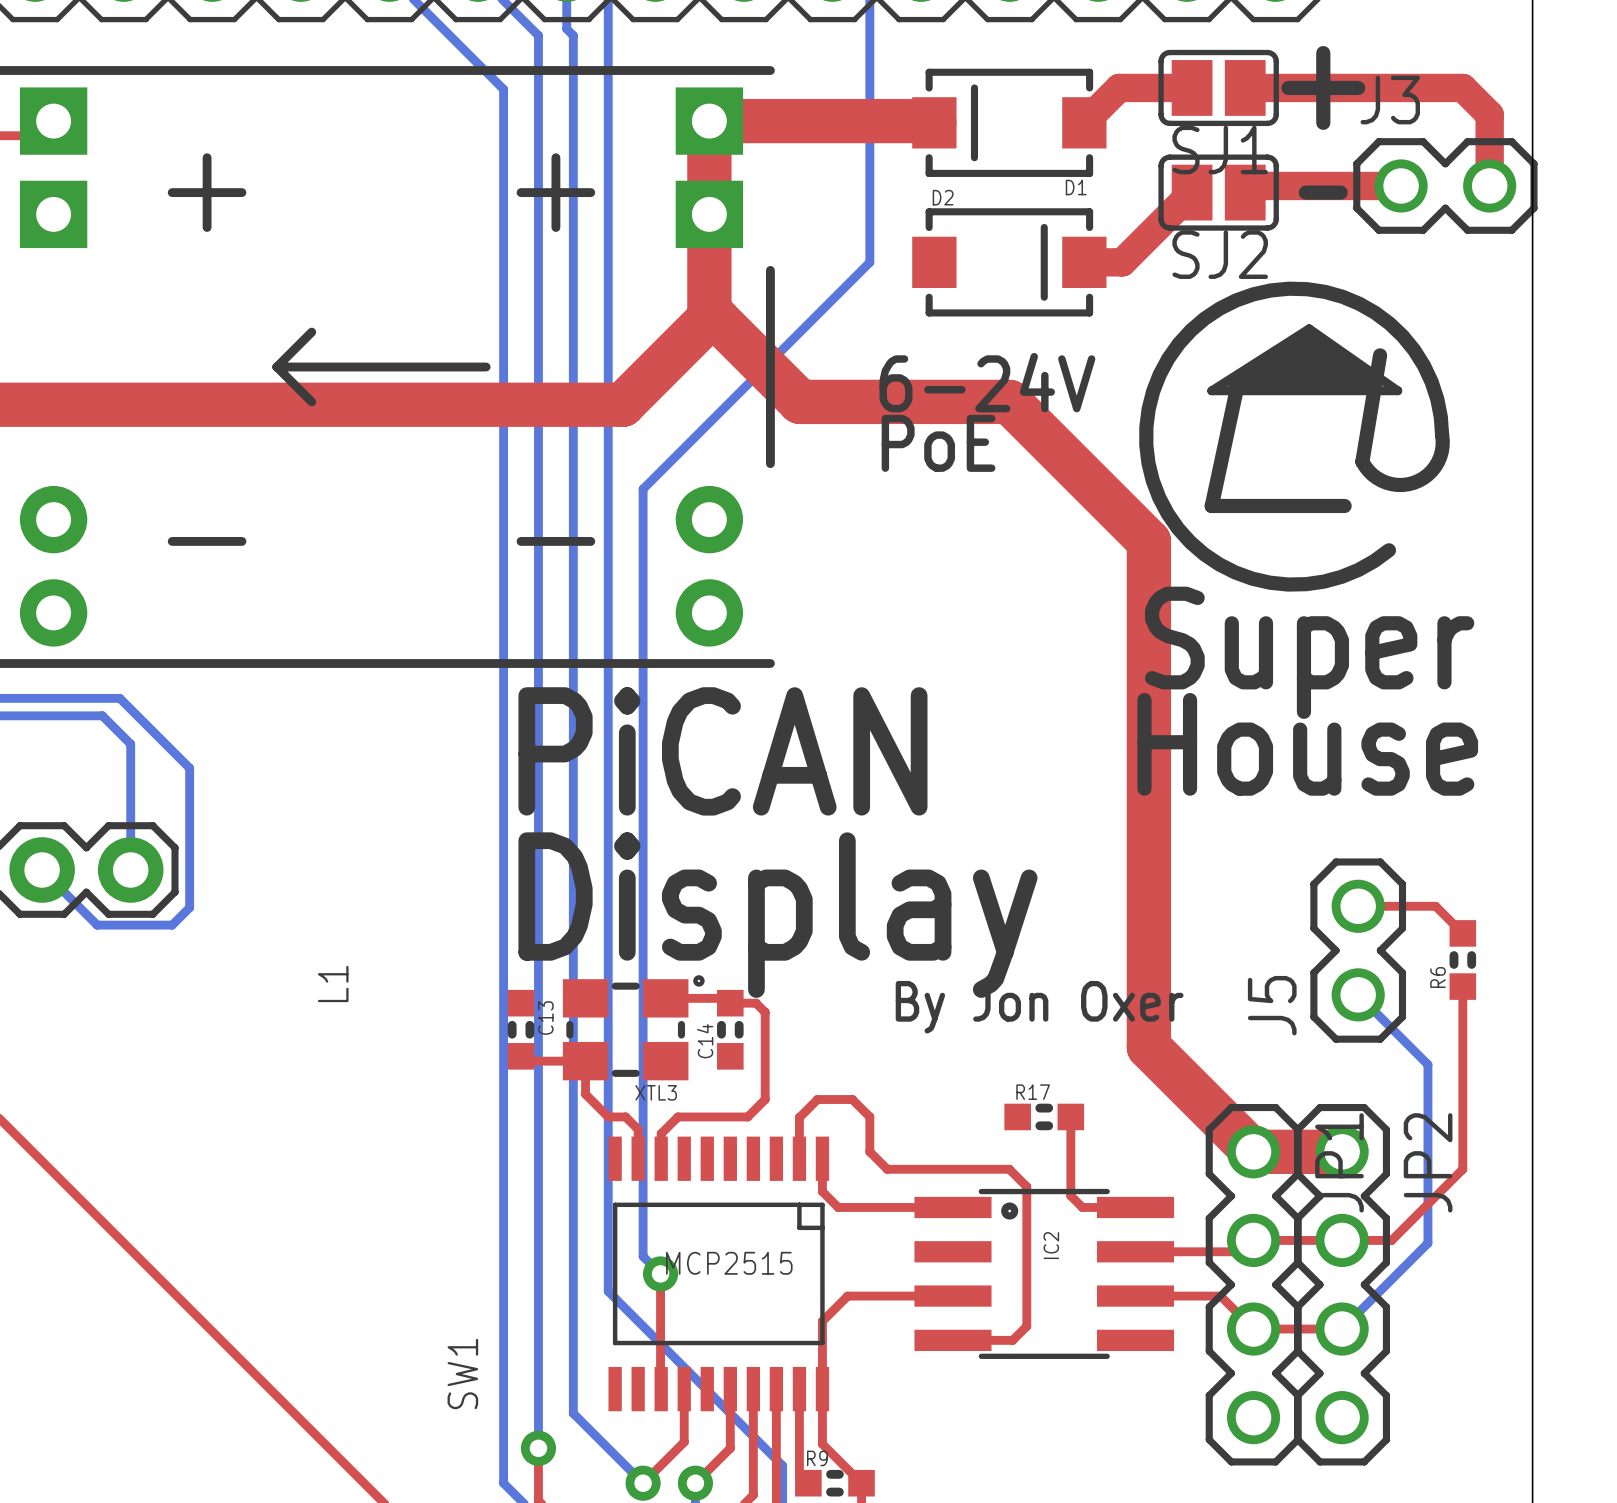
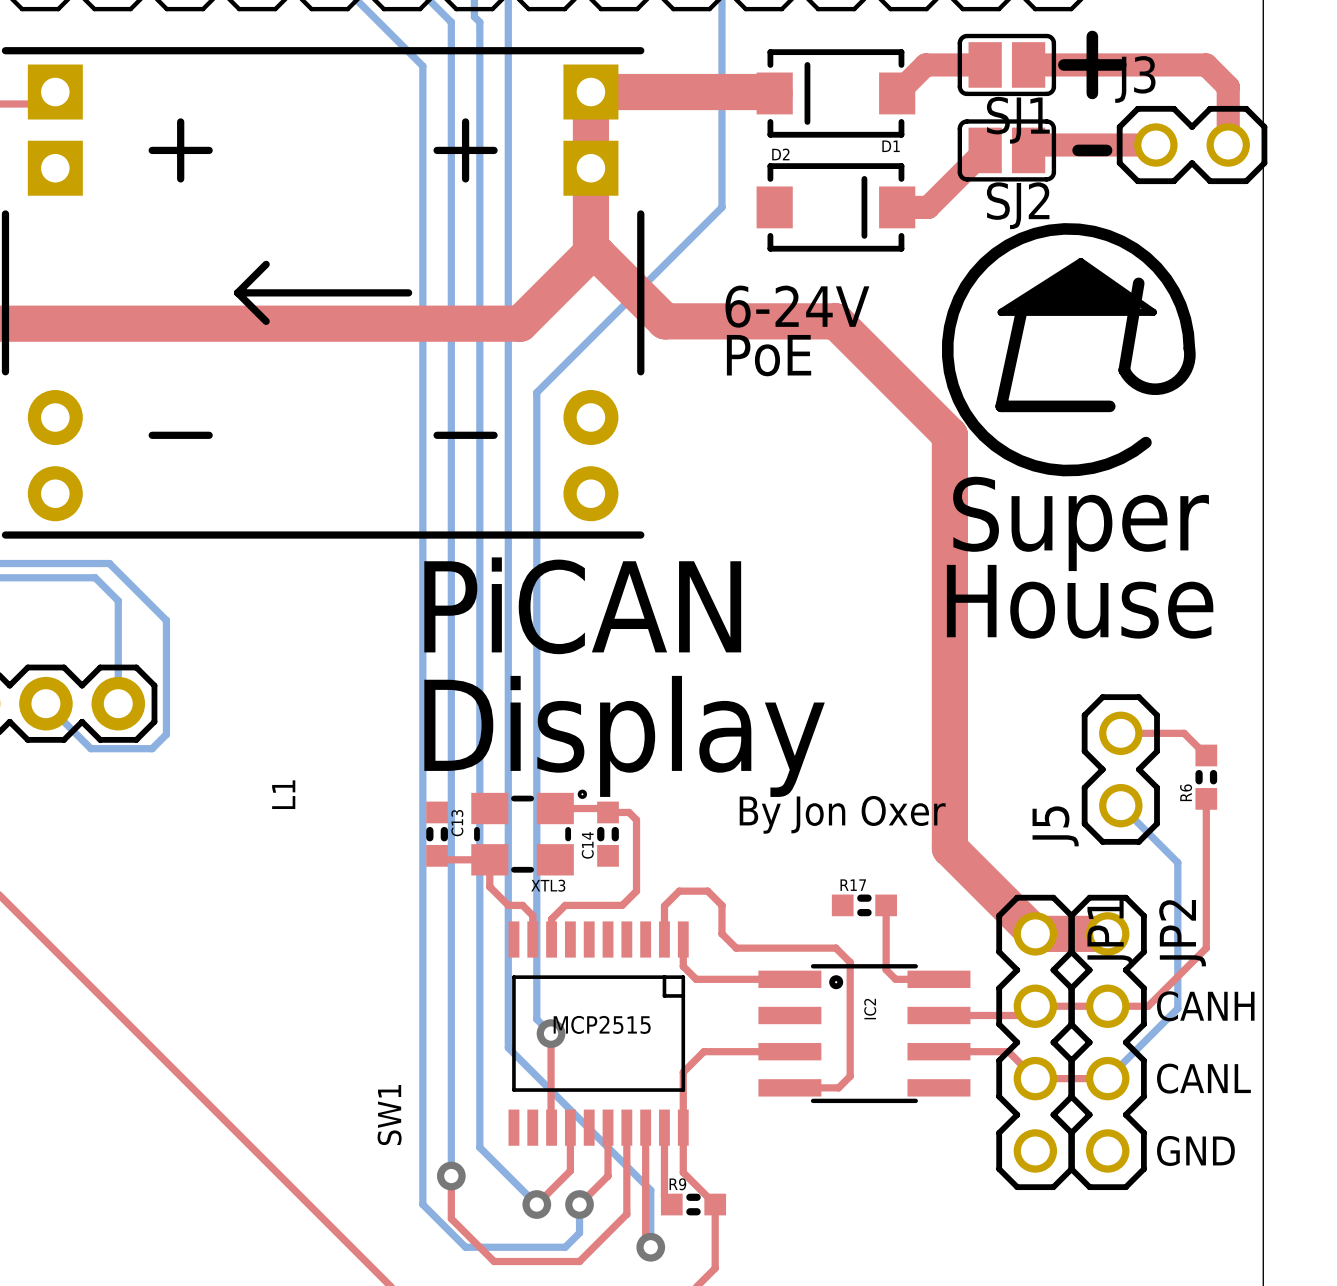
text: none -> CANH (1205, 1006)
text: none -> CANL (1203, 1078)
text: none -> GND (1195, 1150)

